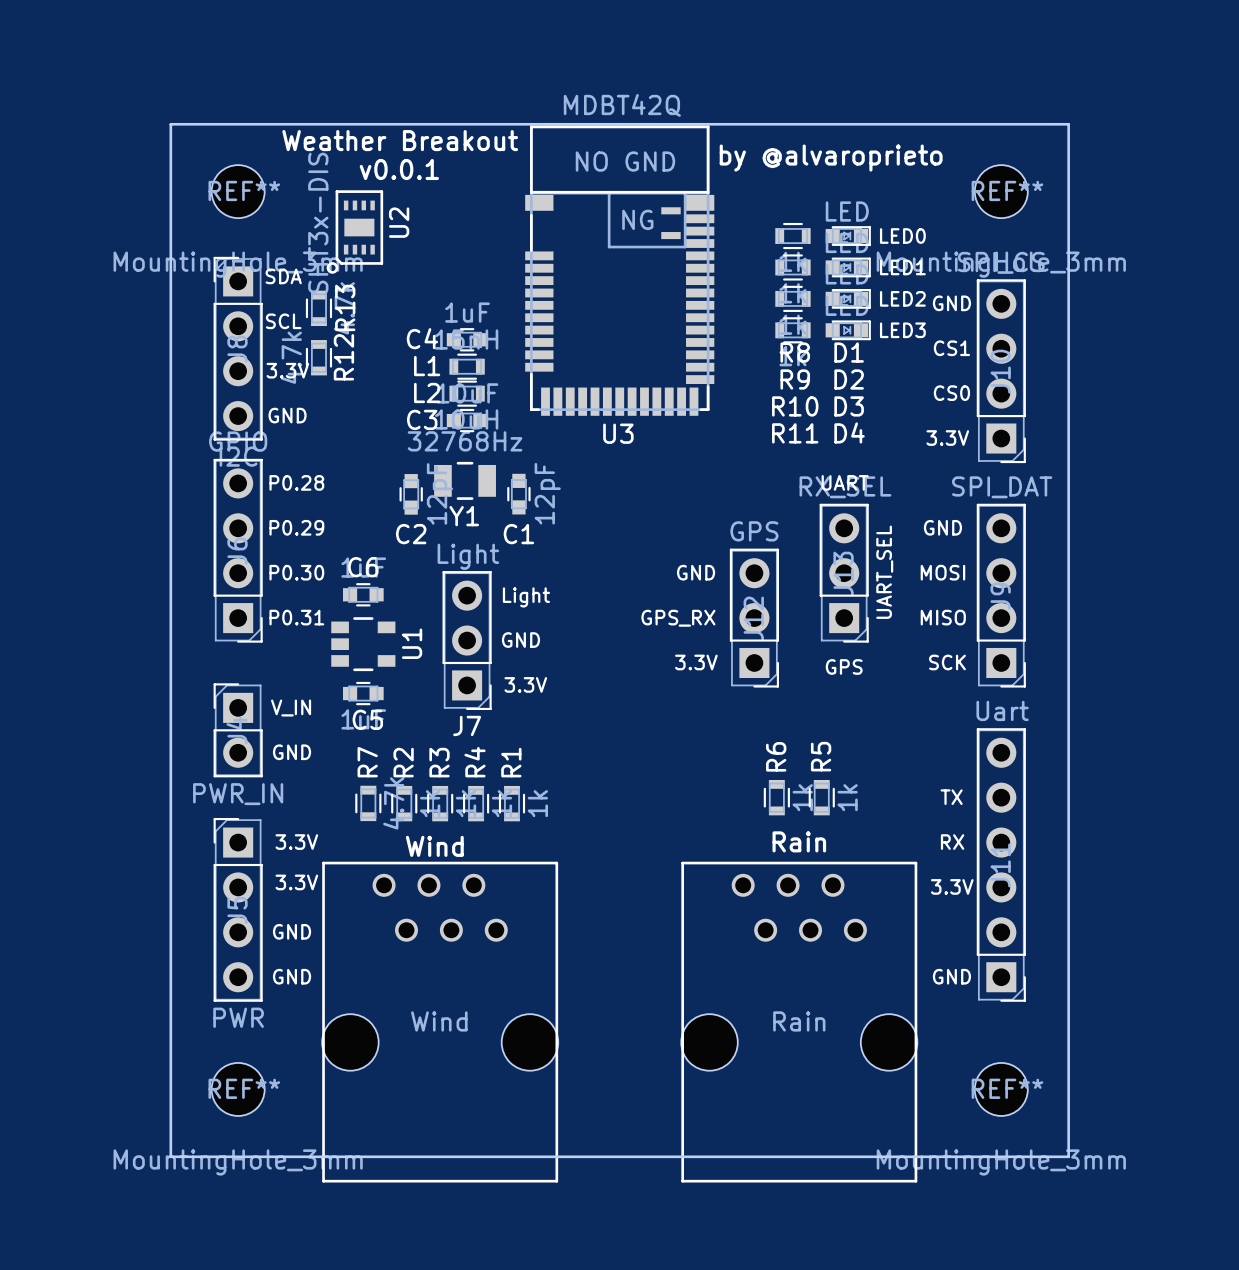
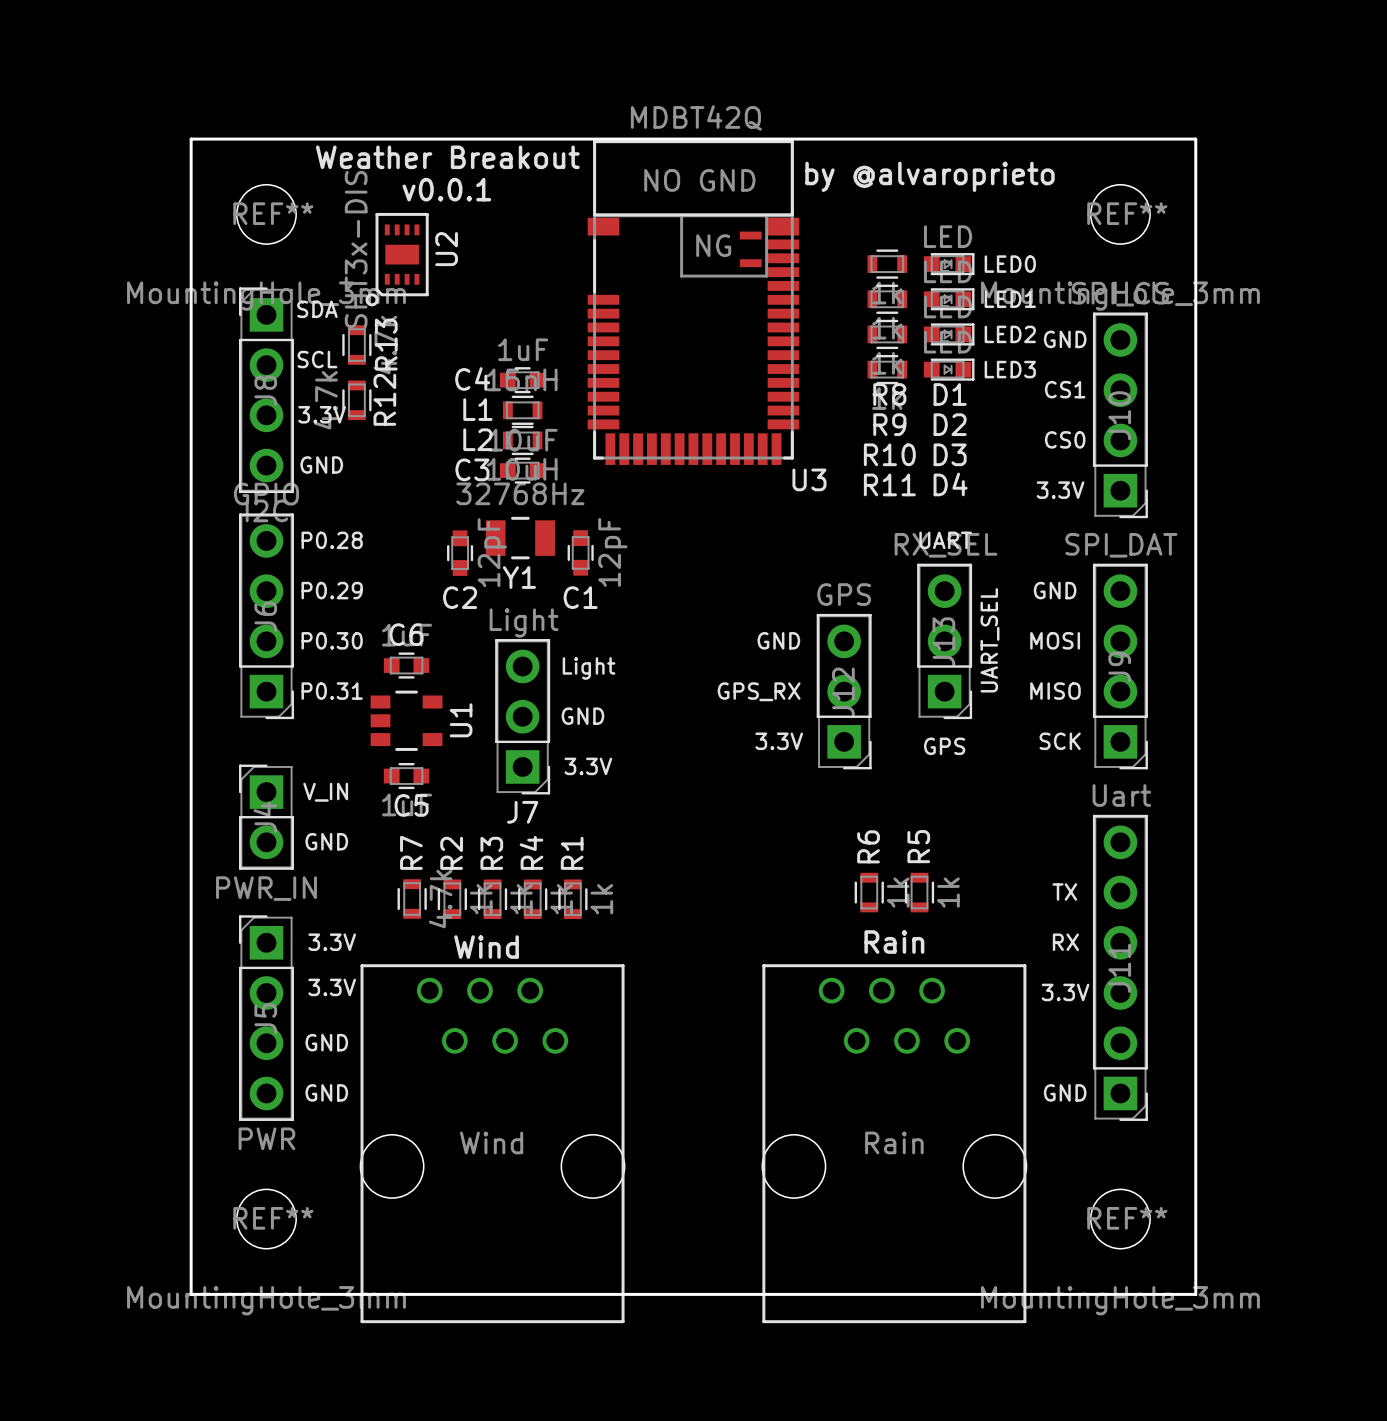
U3 footprint: [525, 125, 715, 416] -> [587, 140, 800, 465]
U3 name position: U3 (618, 433) -> U3 (809, 479)

